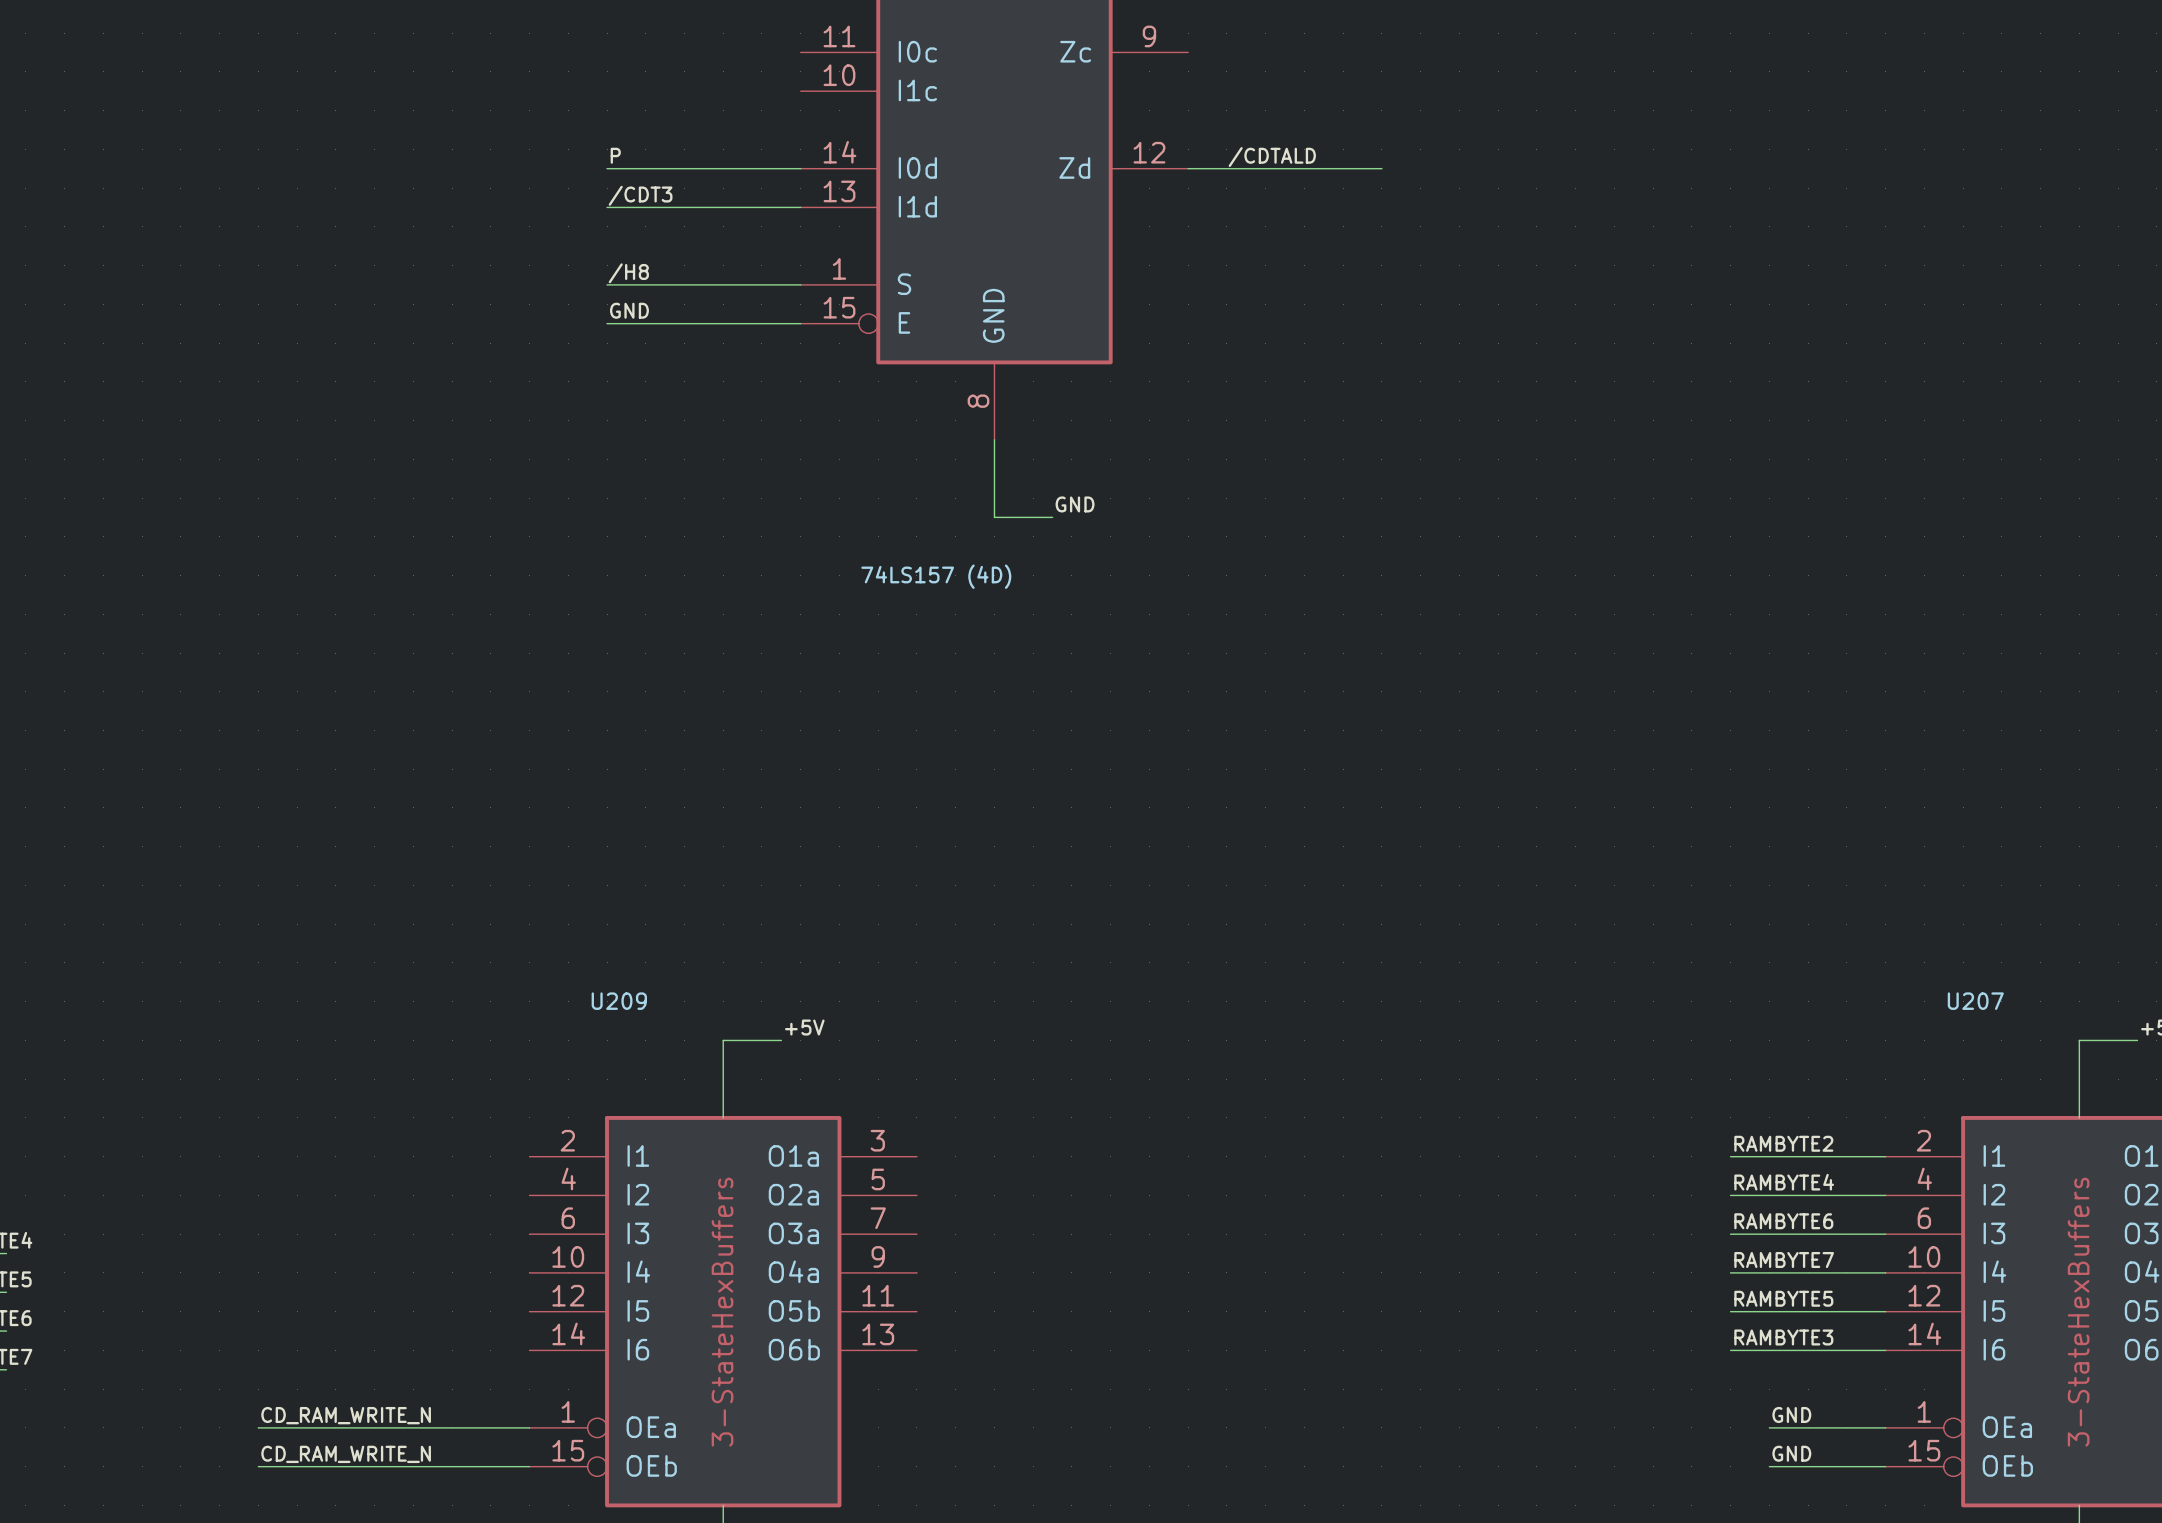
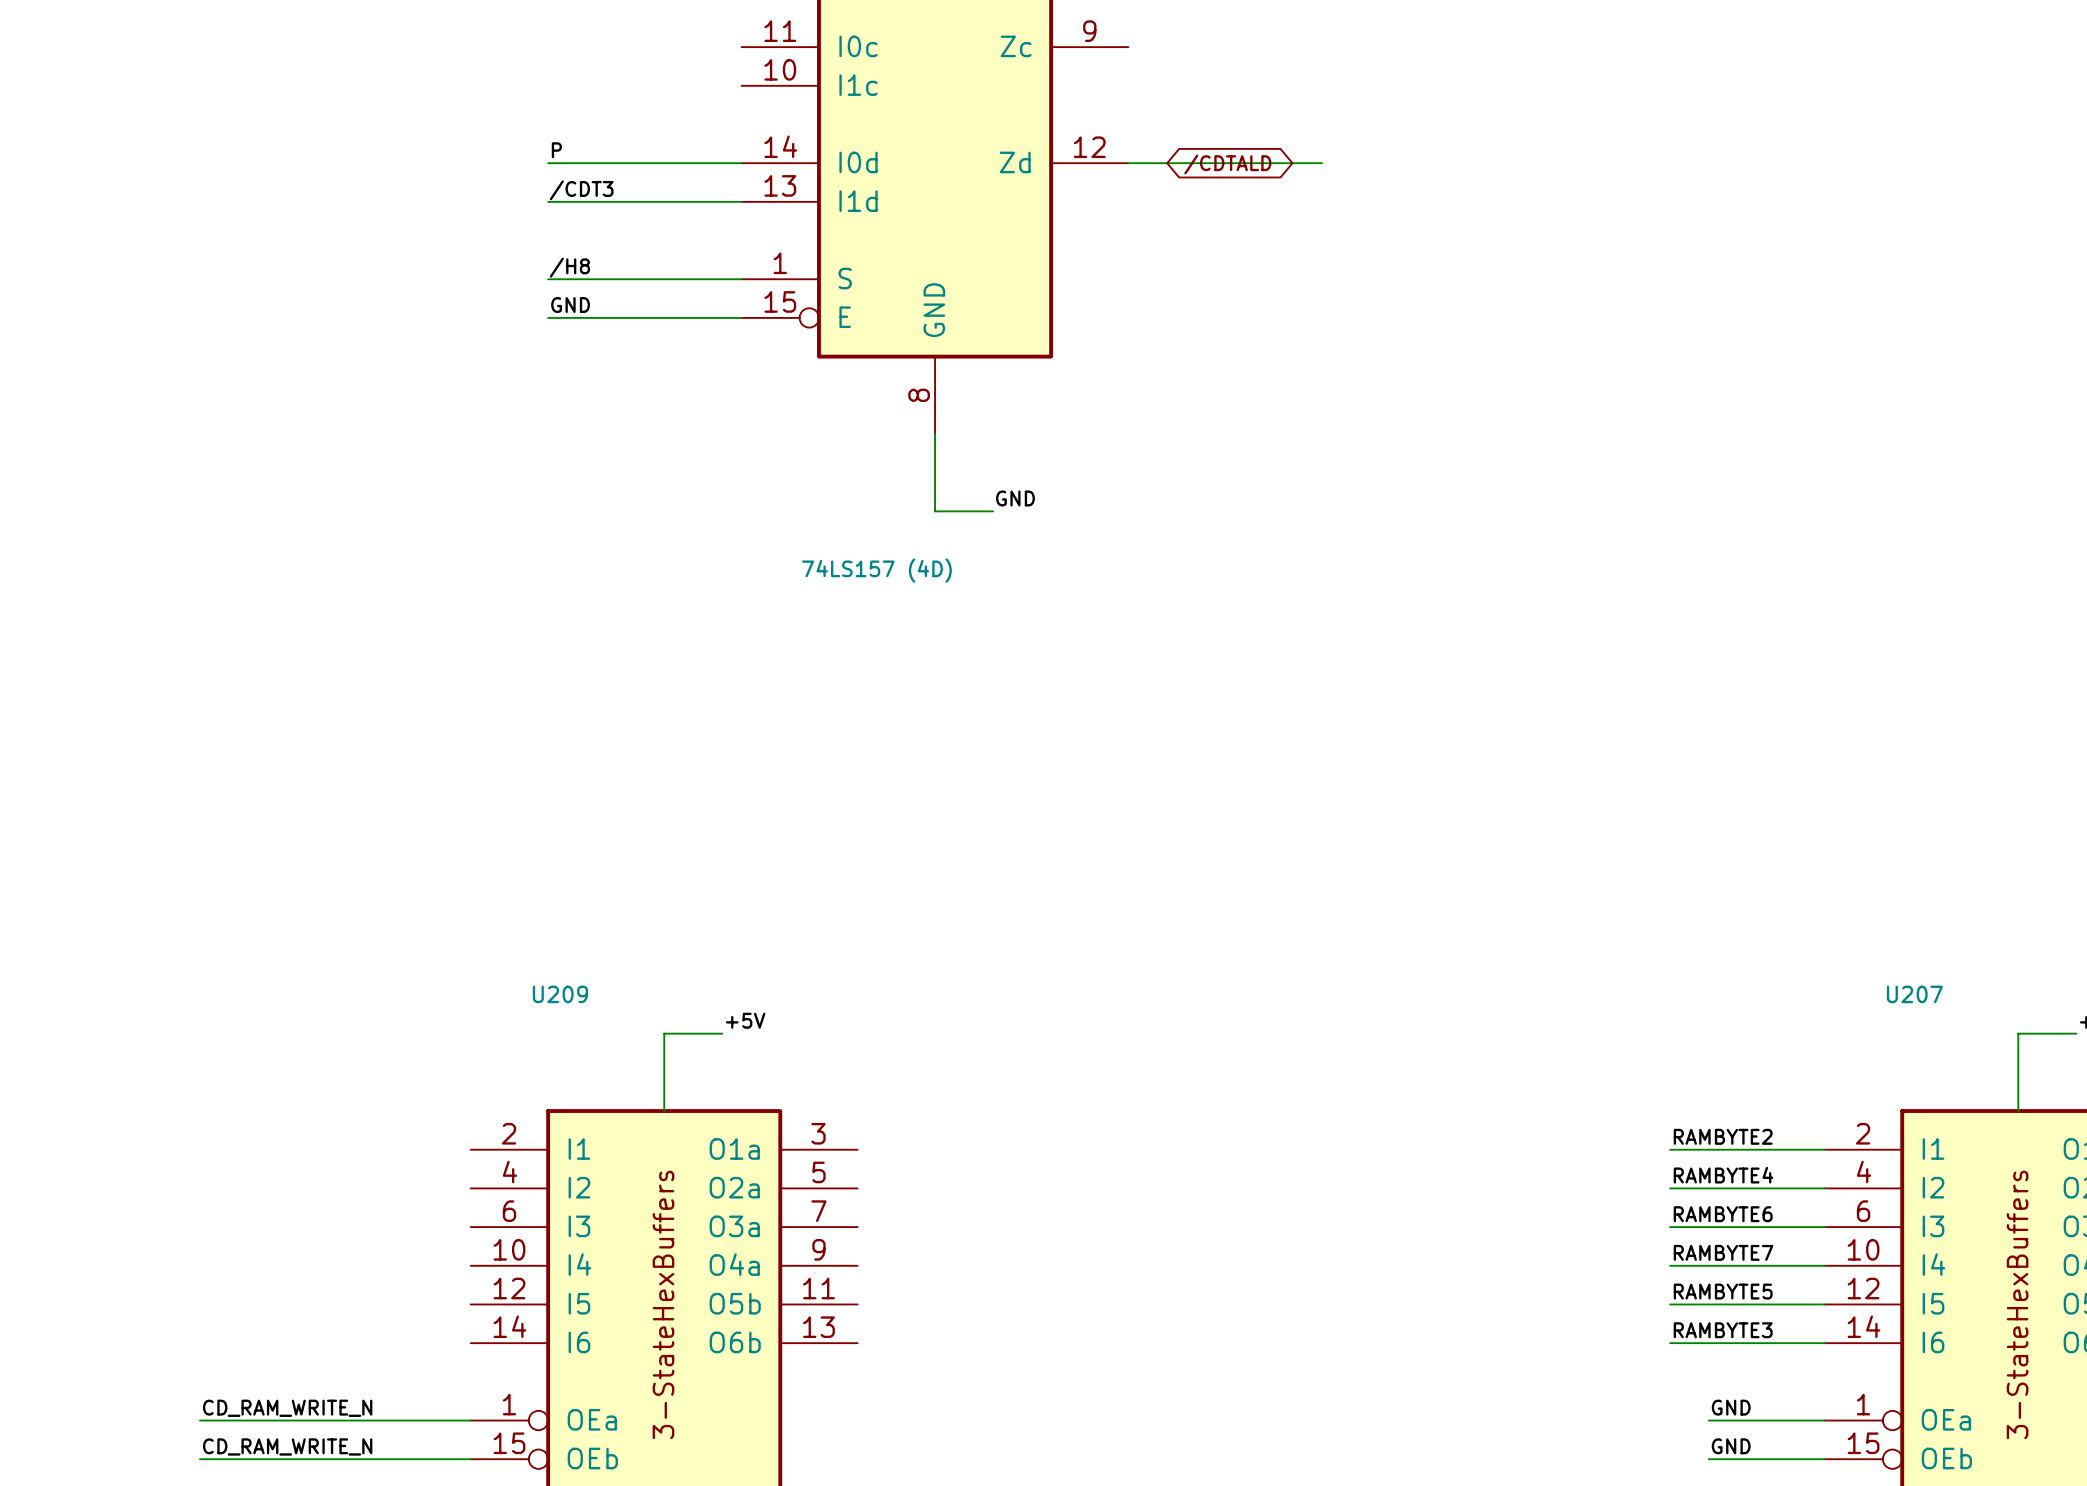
label: /CDTALD (1272, 157) -> none
global label: none -> /CDTALD (1227, 164)

